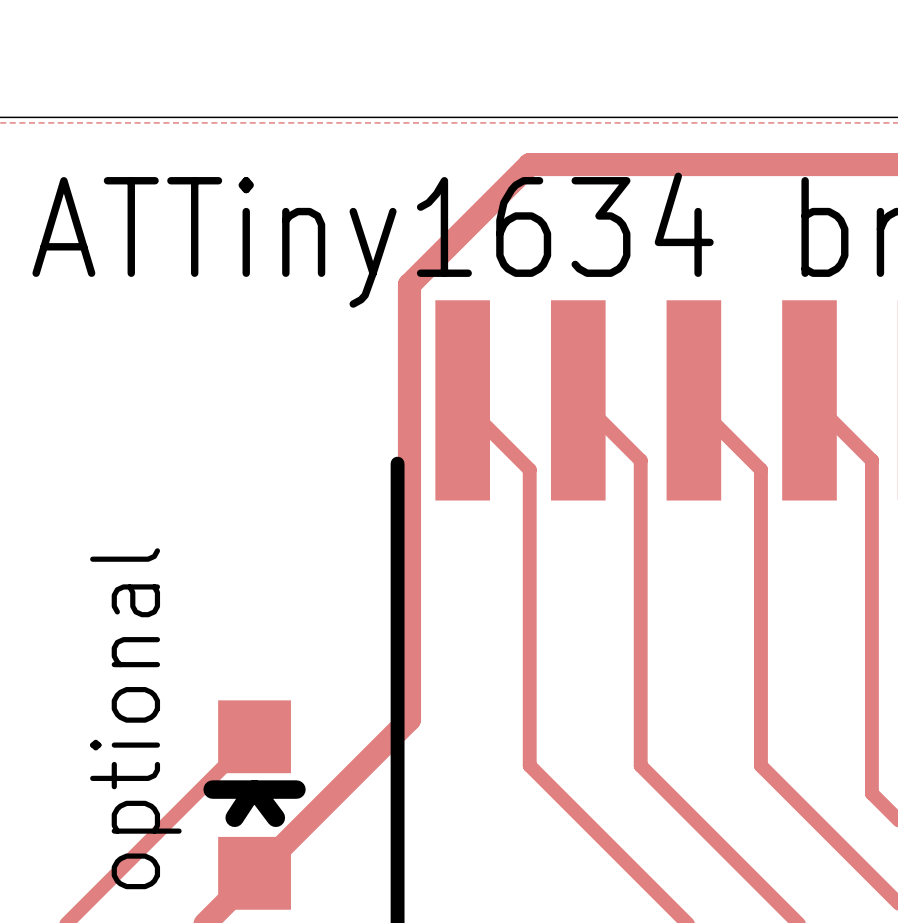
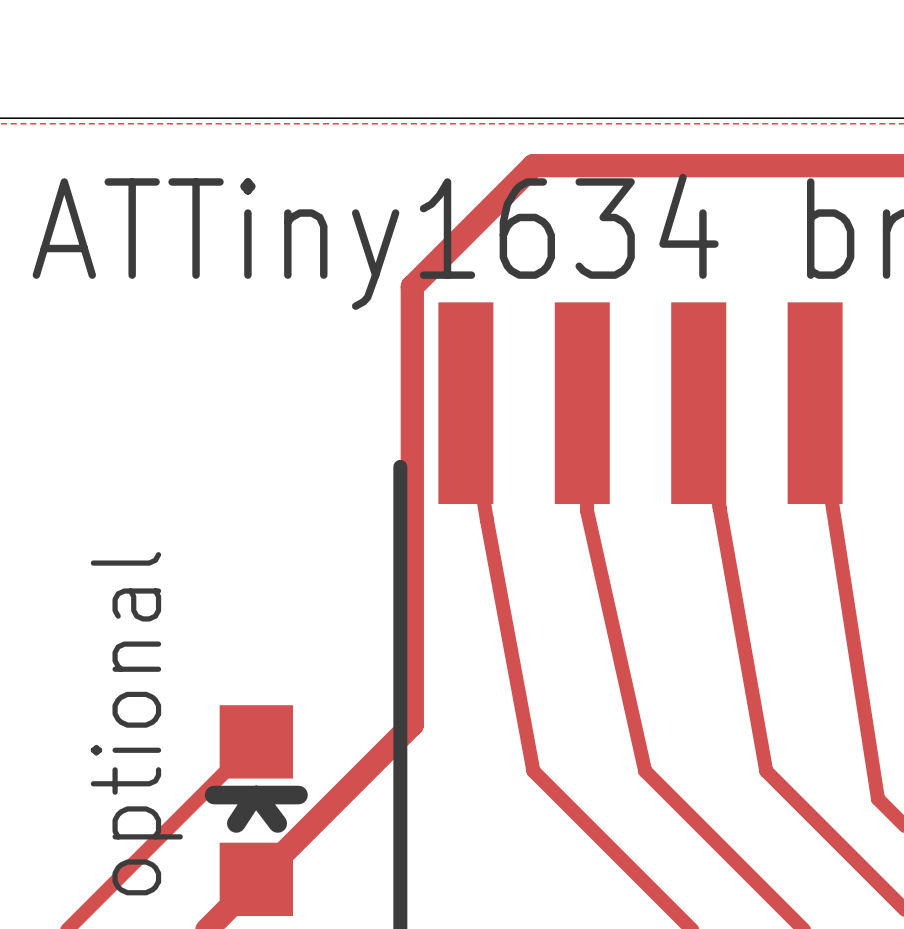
track: (464, 405) (529, 469) (529, 765) -> (468, 407) (533, 771)
track: (585, 405) (640, 460) (640, 765) -> (589, 407) (586, 510) (645, 771)
track: (696, 405) (760, 469) (760, 765) -> (701, 407) (766, 771)
track: (816, 405) (871, 460) (871, 793) -> (822, 407) (831, 498) (877, 798)

